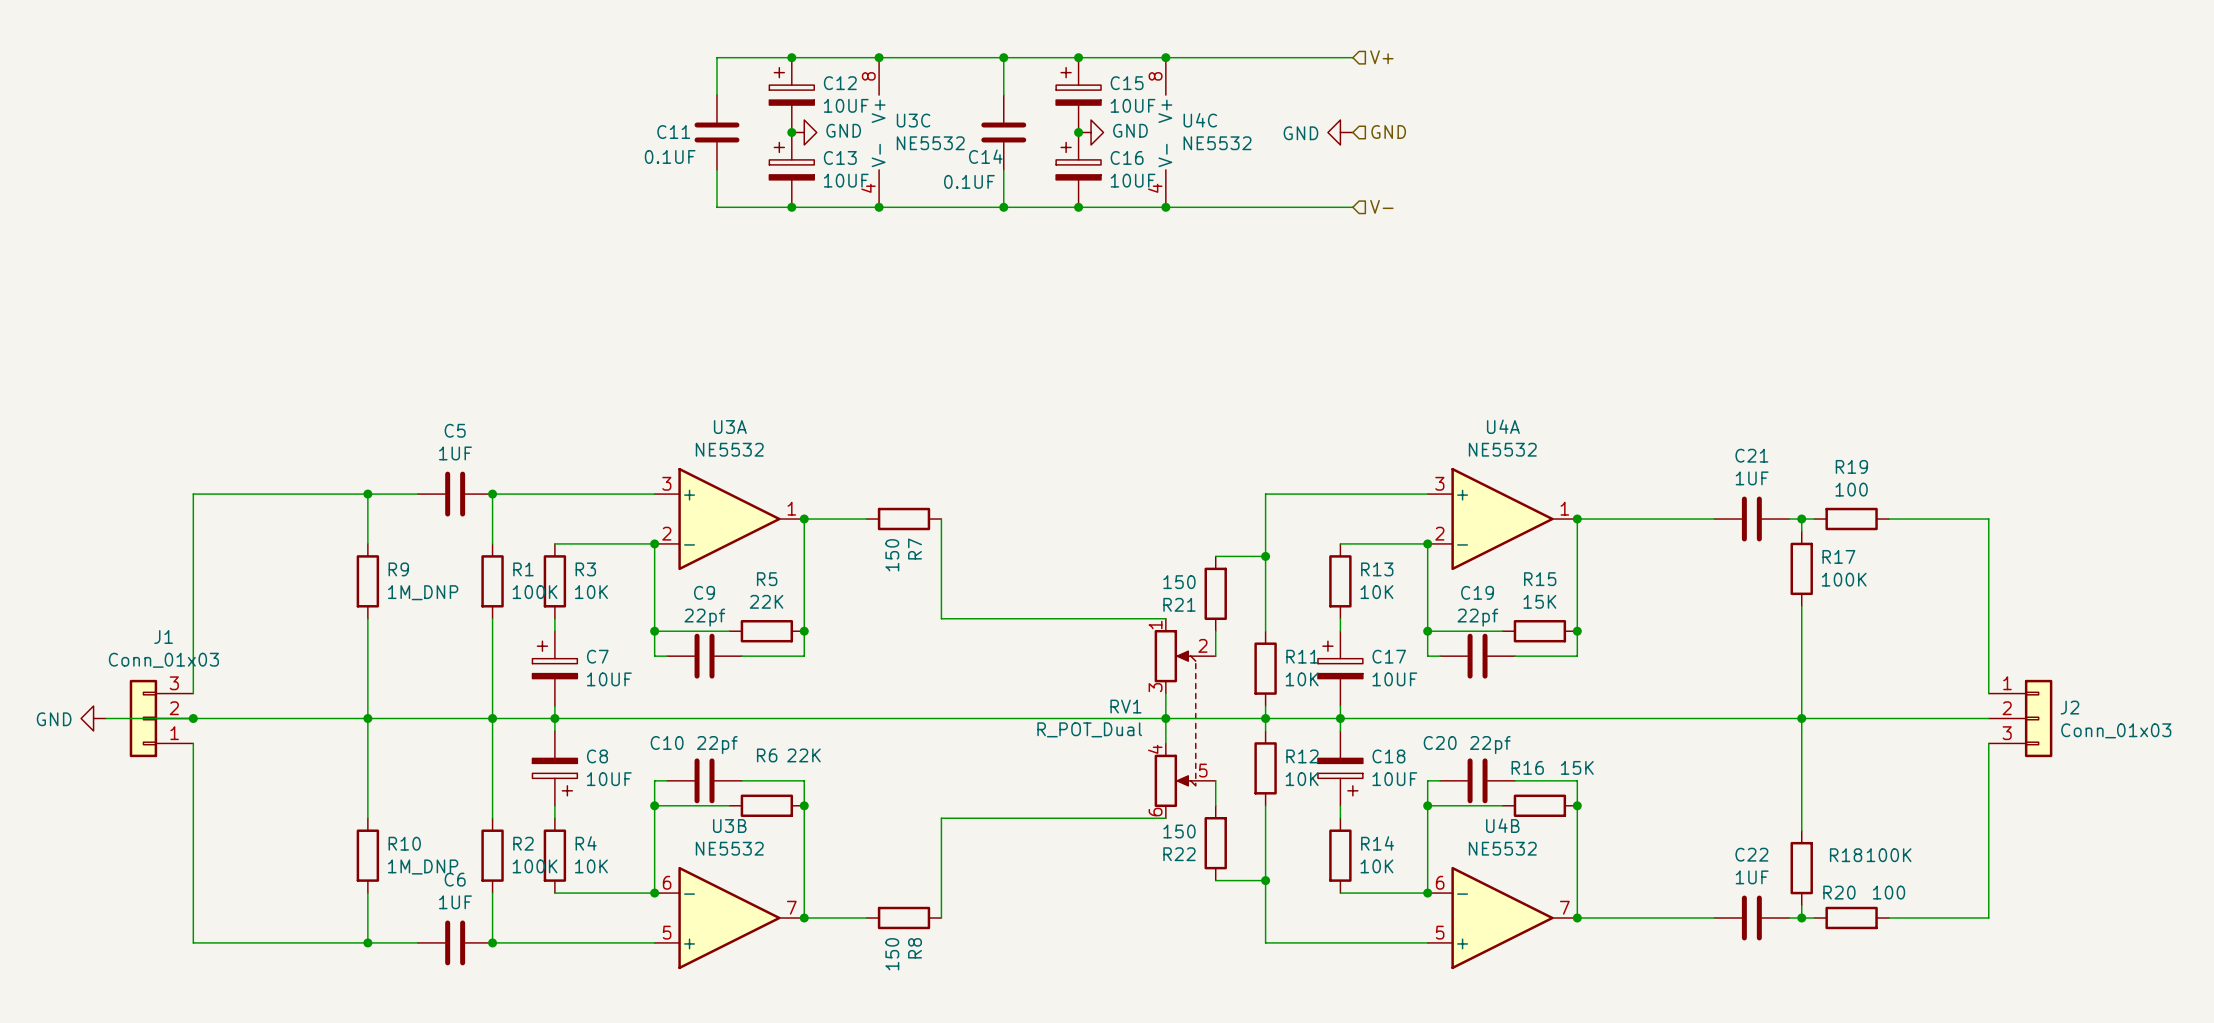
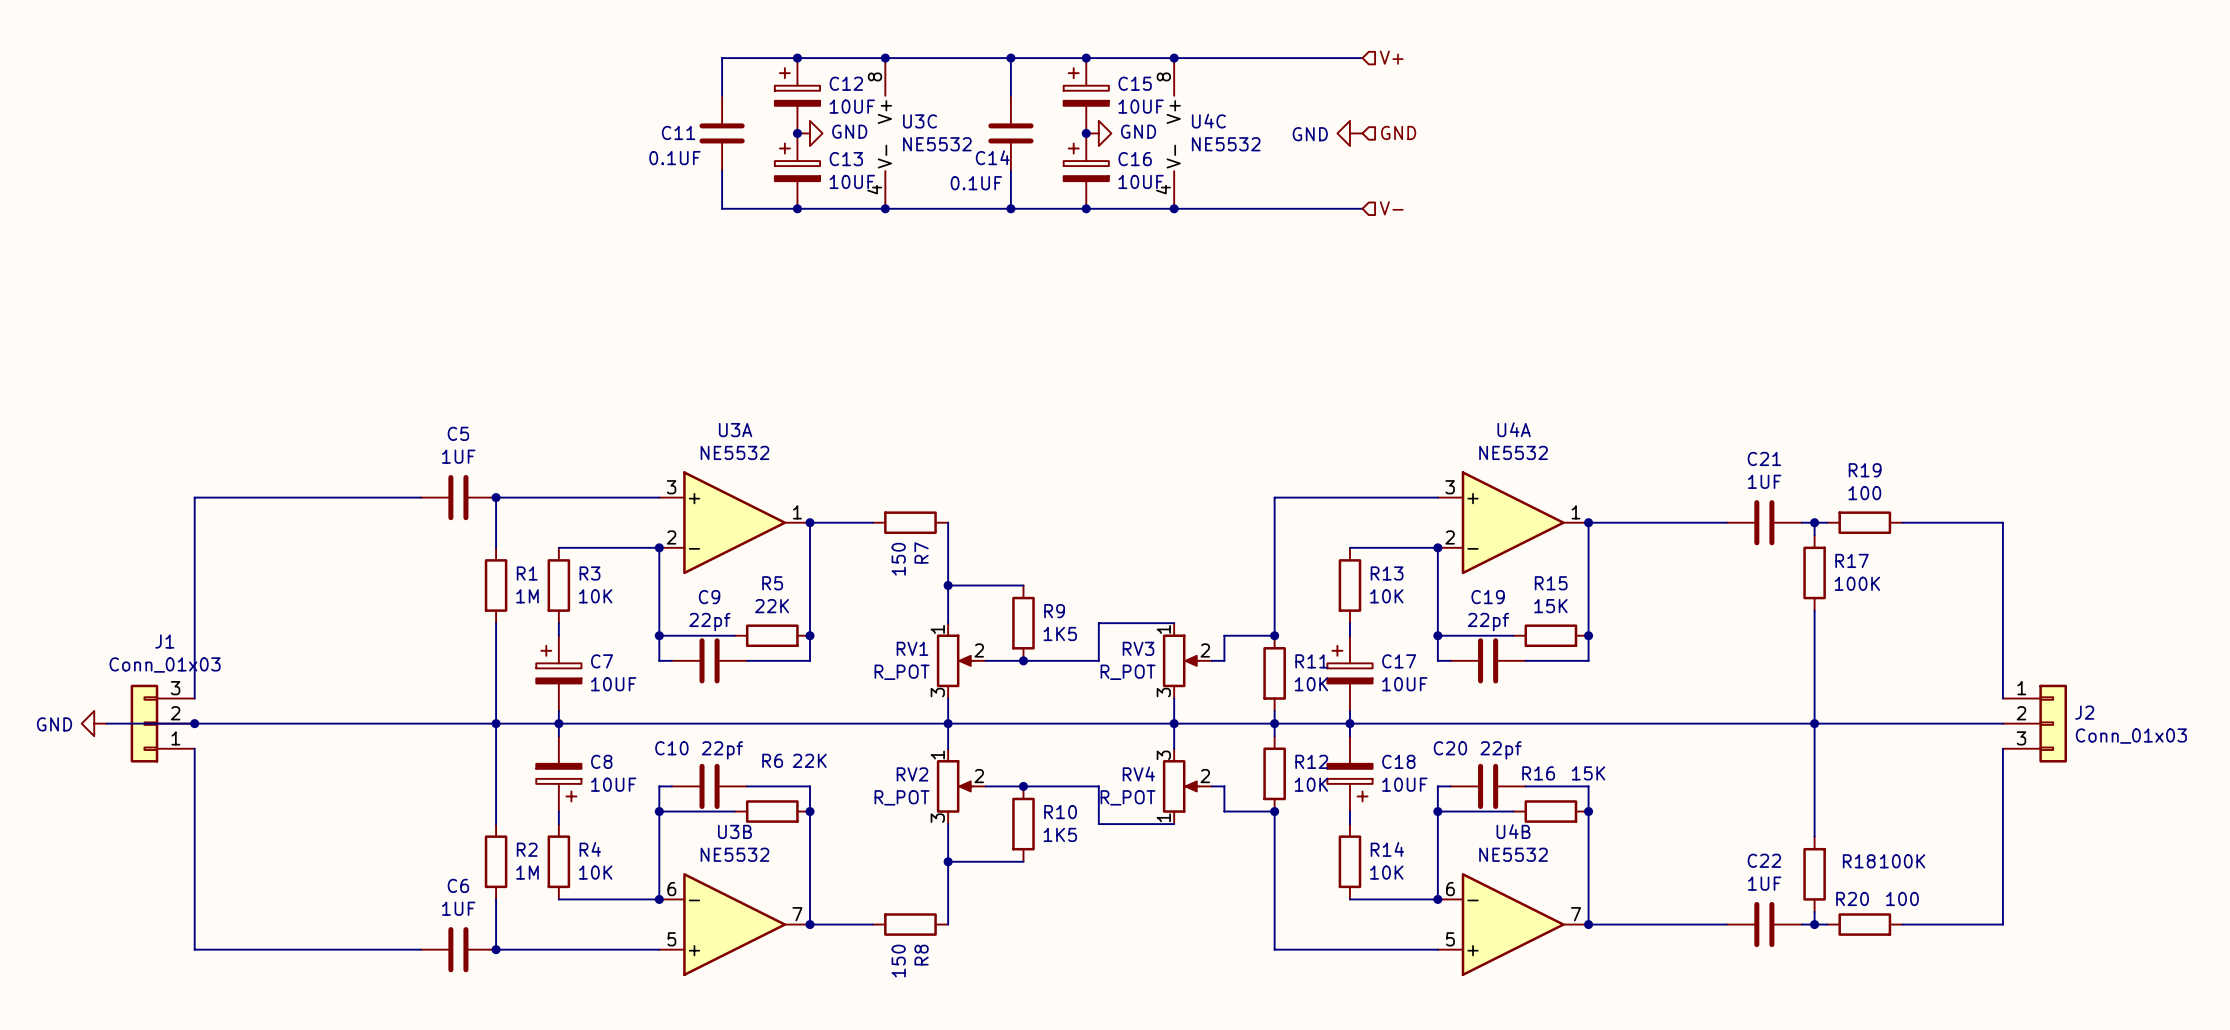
wire: (367, 494) (367, 543) -> none
junction: (367, 494) -> none
wire: (1215, 556) (1265, 556) -> (1224, 635) (1274, 635)
junction: (1265, 556) -> none
R9 position: (367, 581) -> (1023, 623)
wire: none -> (948, 585) (1023, 585)
junction: none -> (948, 585)
R9 value: 1M_DNP (423, 592) -> 1K5 (1060, 634)
R1 value: 100K (535, 592) -> 1M (527, 596)
R21: 150 (1215, 593) -> none
wire: (367, 618) (367, 818) -> none
wire: (941, 618) (1091, 618) -> (985, 660) (1098, 660) (1098, 623)
RV1 symbol: [1154, 618, 1216, 819] -> [936, 623, 986, 699]
junction: none -> (1274, 635)
junction: none -> (1023, 660)
RV3: none -> R_POT (1187, 660)
wire: none -> (948, 698) (948, 748)
junction: (367, 718) -> none
junction: none -> (948, 723)
RV1 value: R_POT_Dual (1089, 729) -> R_POT (902, 672)
RV2: none -> R_POT (961, 786)
junction: none -> (1023, 786)
RV4: none -> R_POT (1187, 786)
junction: none -> (1274, 811)
wire: (941, 818) (1091, 818) -> (985, 786) (1098, 786) (1098, 824)
R22: 150 (1215, 843) -> none
R10 position: (367, 855) -> (1023, 824)
wire: none -> (948, 861) (1023, 861)
junction: none -> (948, 861)
R2 value: 100K (535, 866) -> 1M (527, 872)
R10 value: 1M_DNP (423, 867) -> 1K5 (1060, 834)
wire: (1215, 880) (1265, 880) -> (1224, 811) (1274, 811)
junction: (1265, 880) -> none
wire: (367, 893) (367, 942) -> none
junction: (367, 942) -> none

